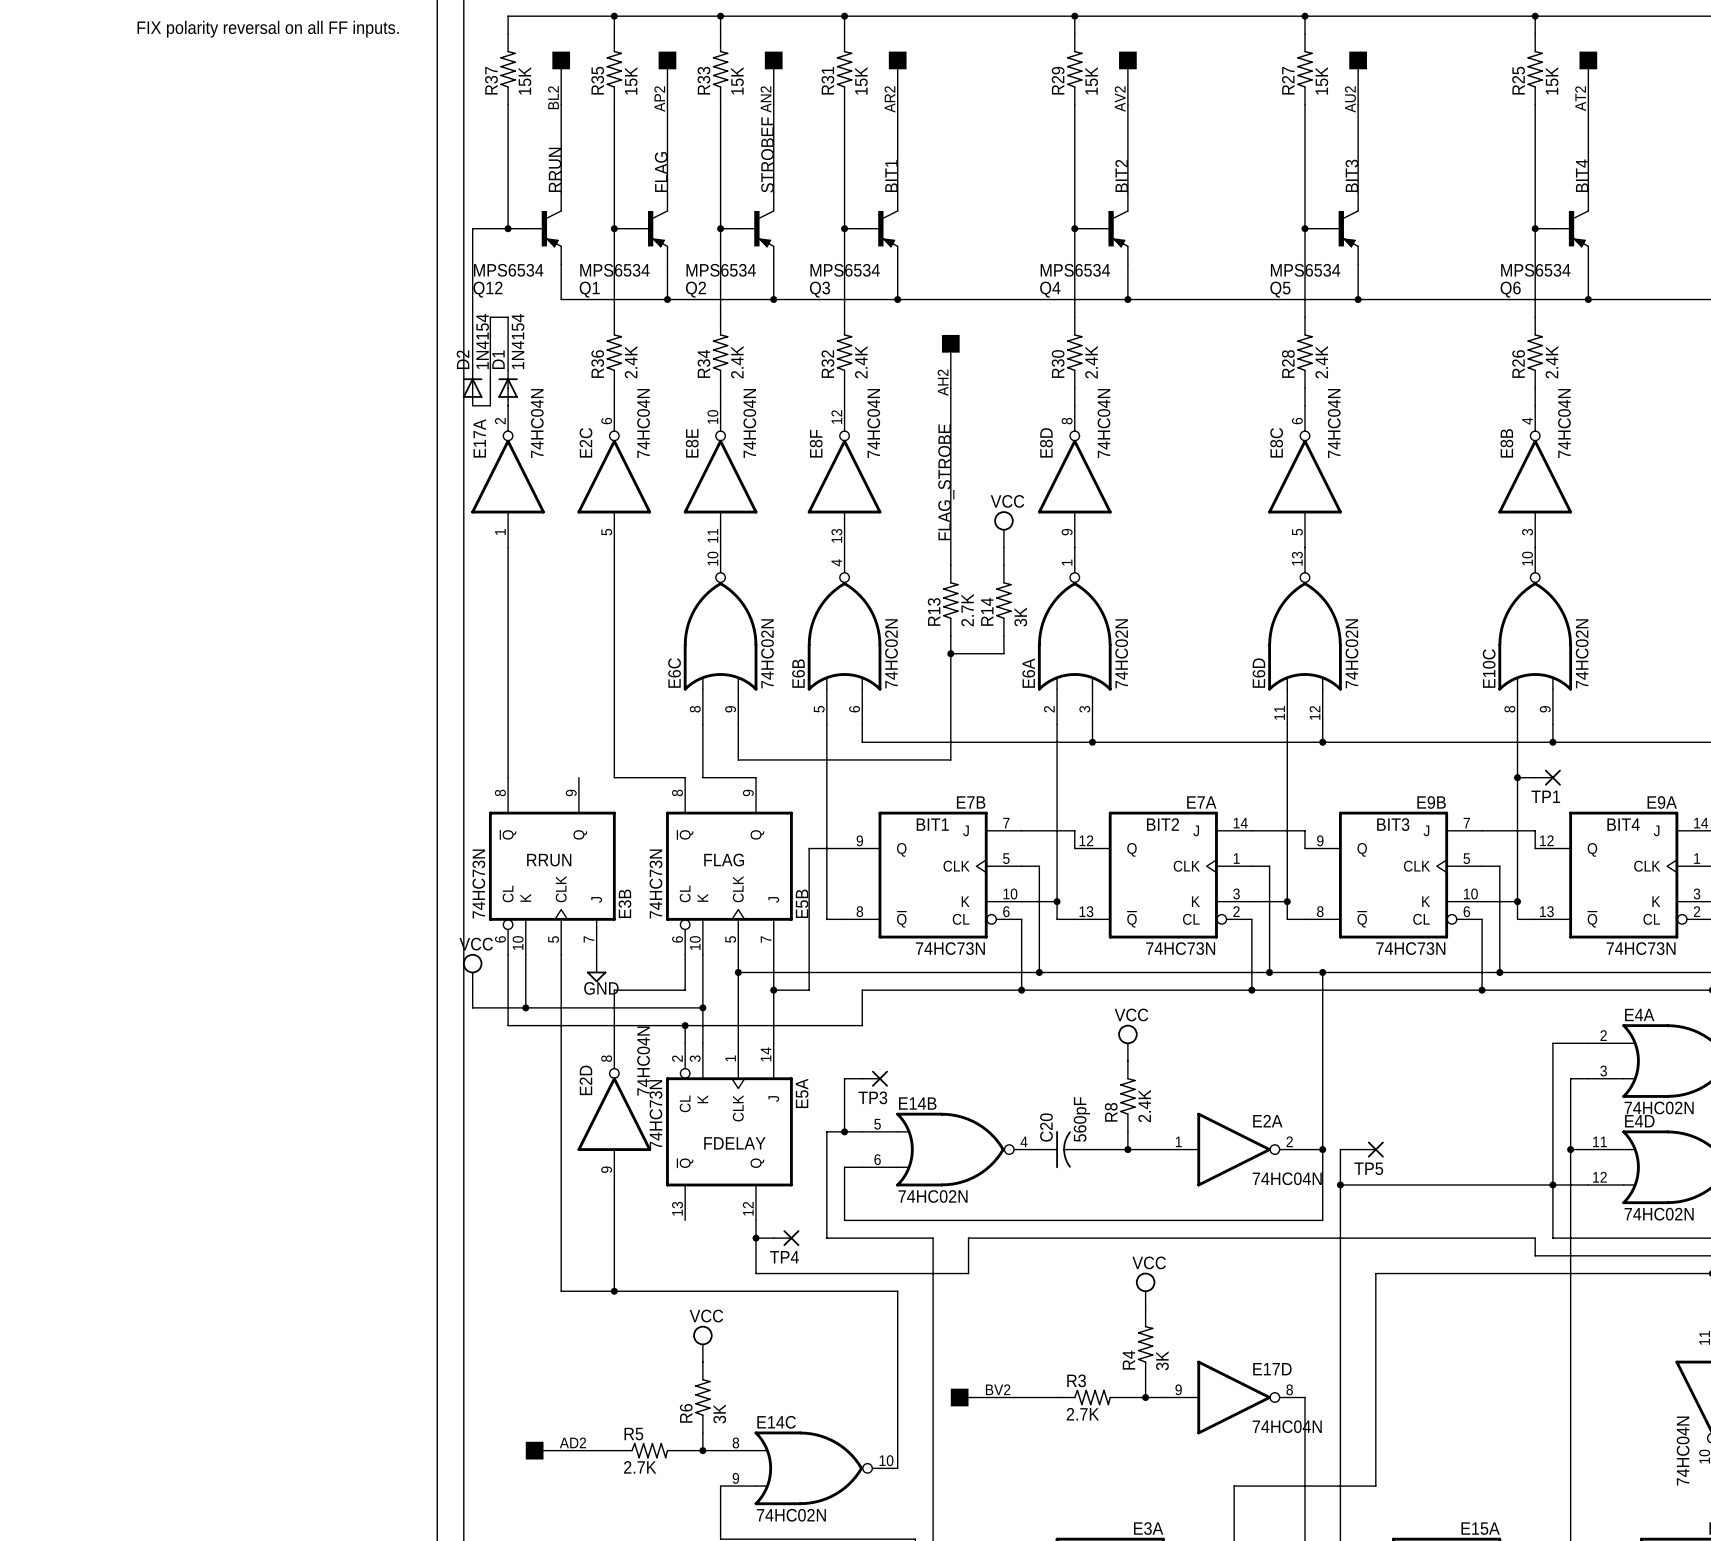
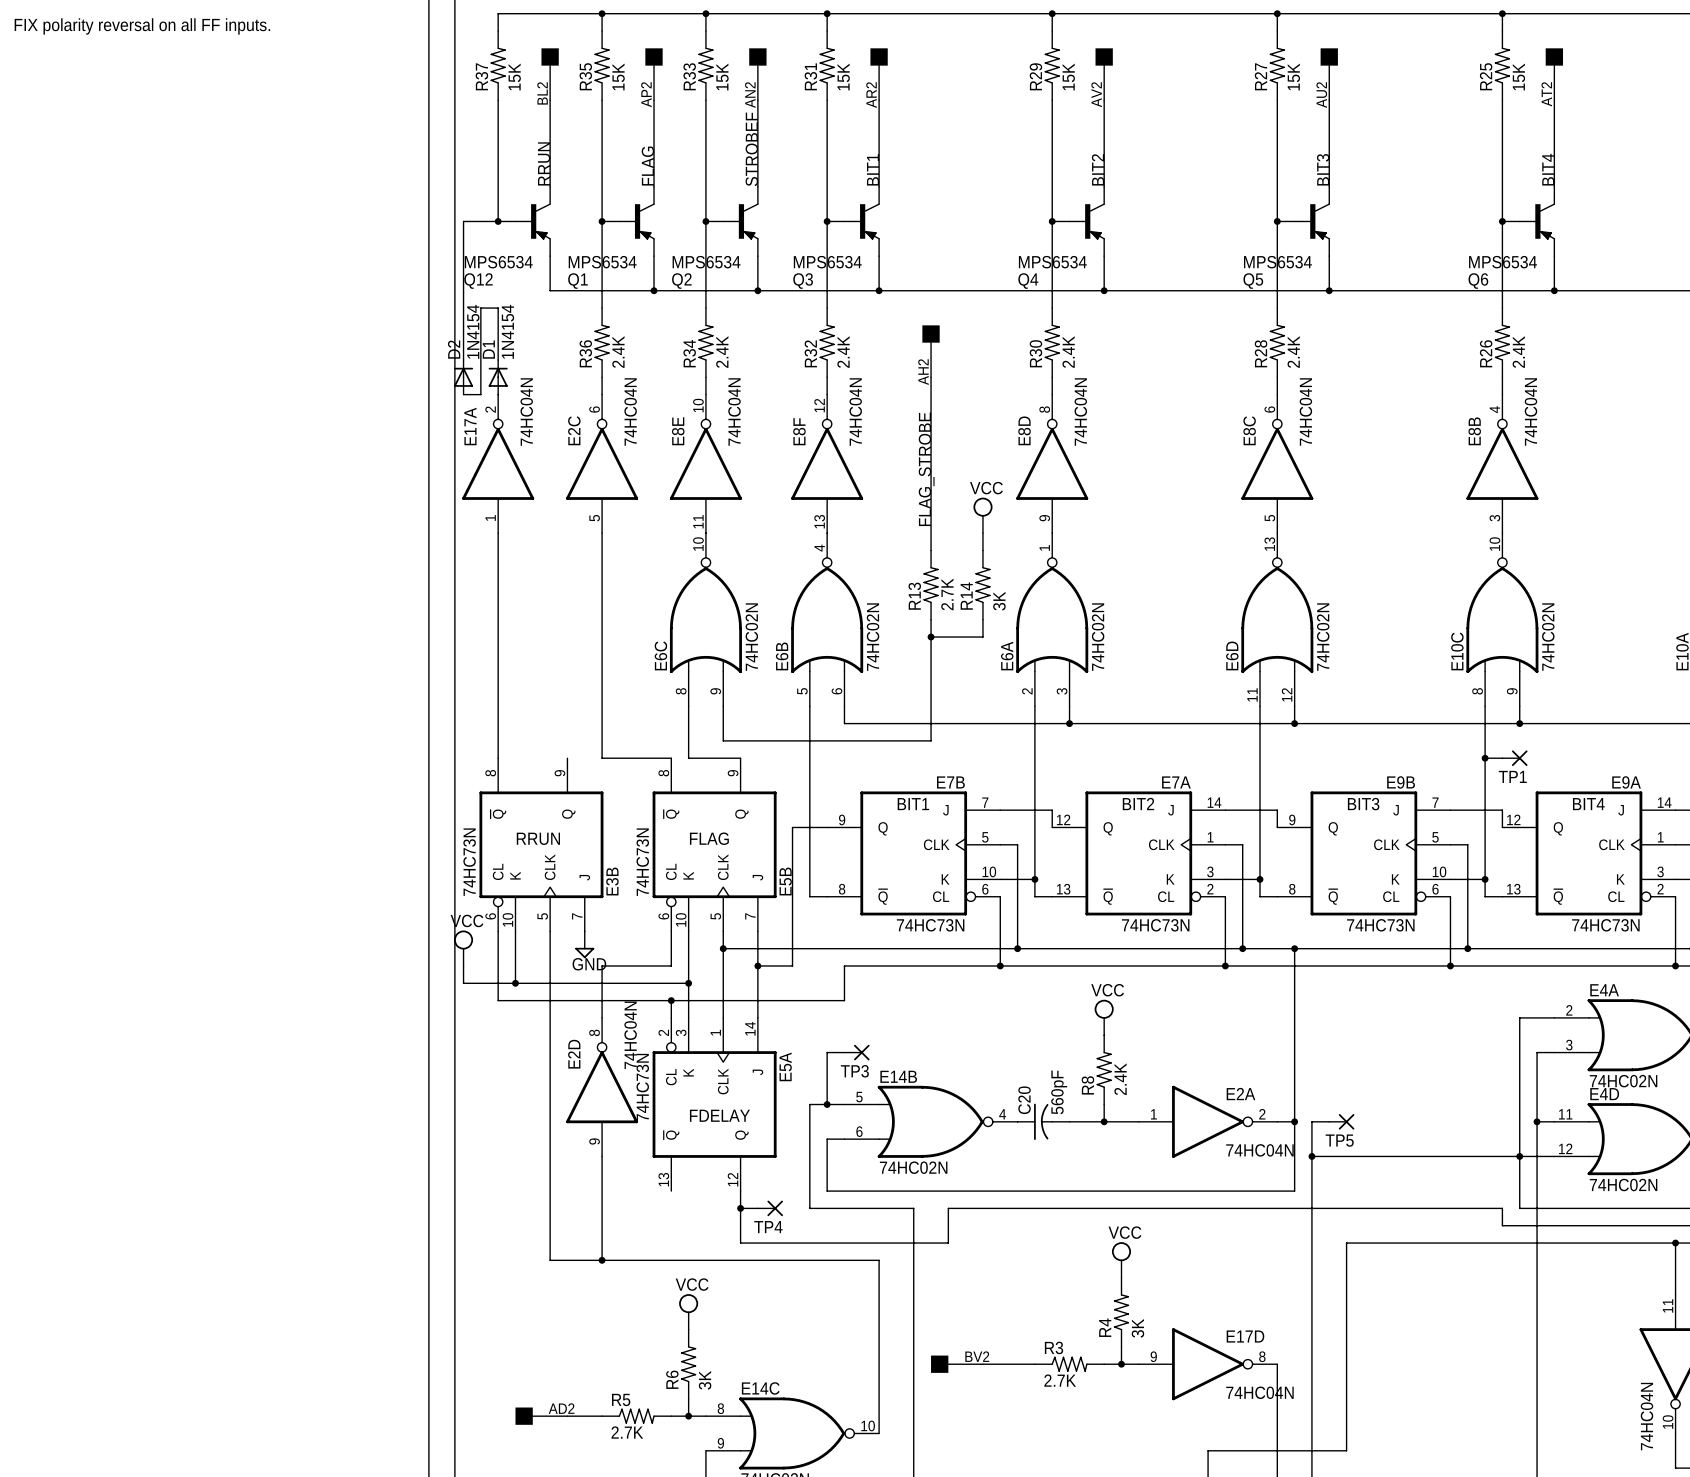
text position: FIX polarity reversal on all FF inputs. (268, 29) -> FIX polarity reversal on all FF inputs. (142, 26)

